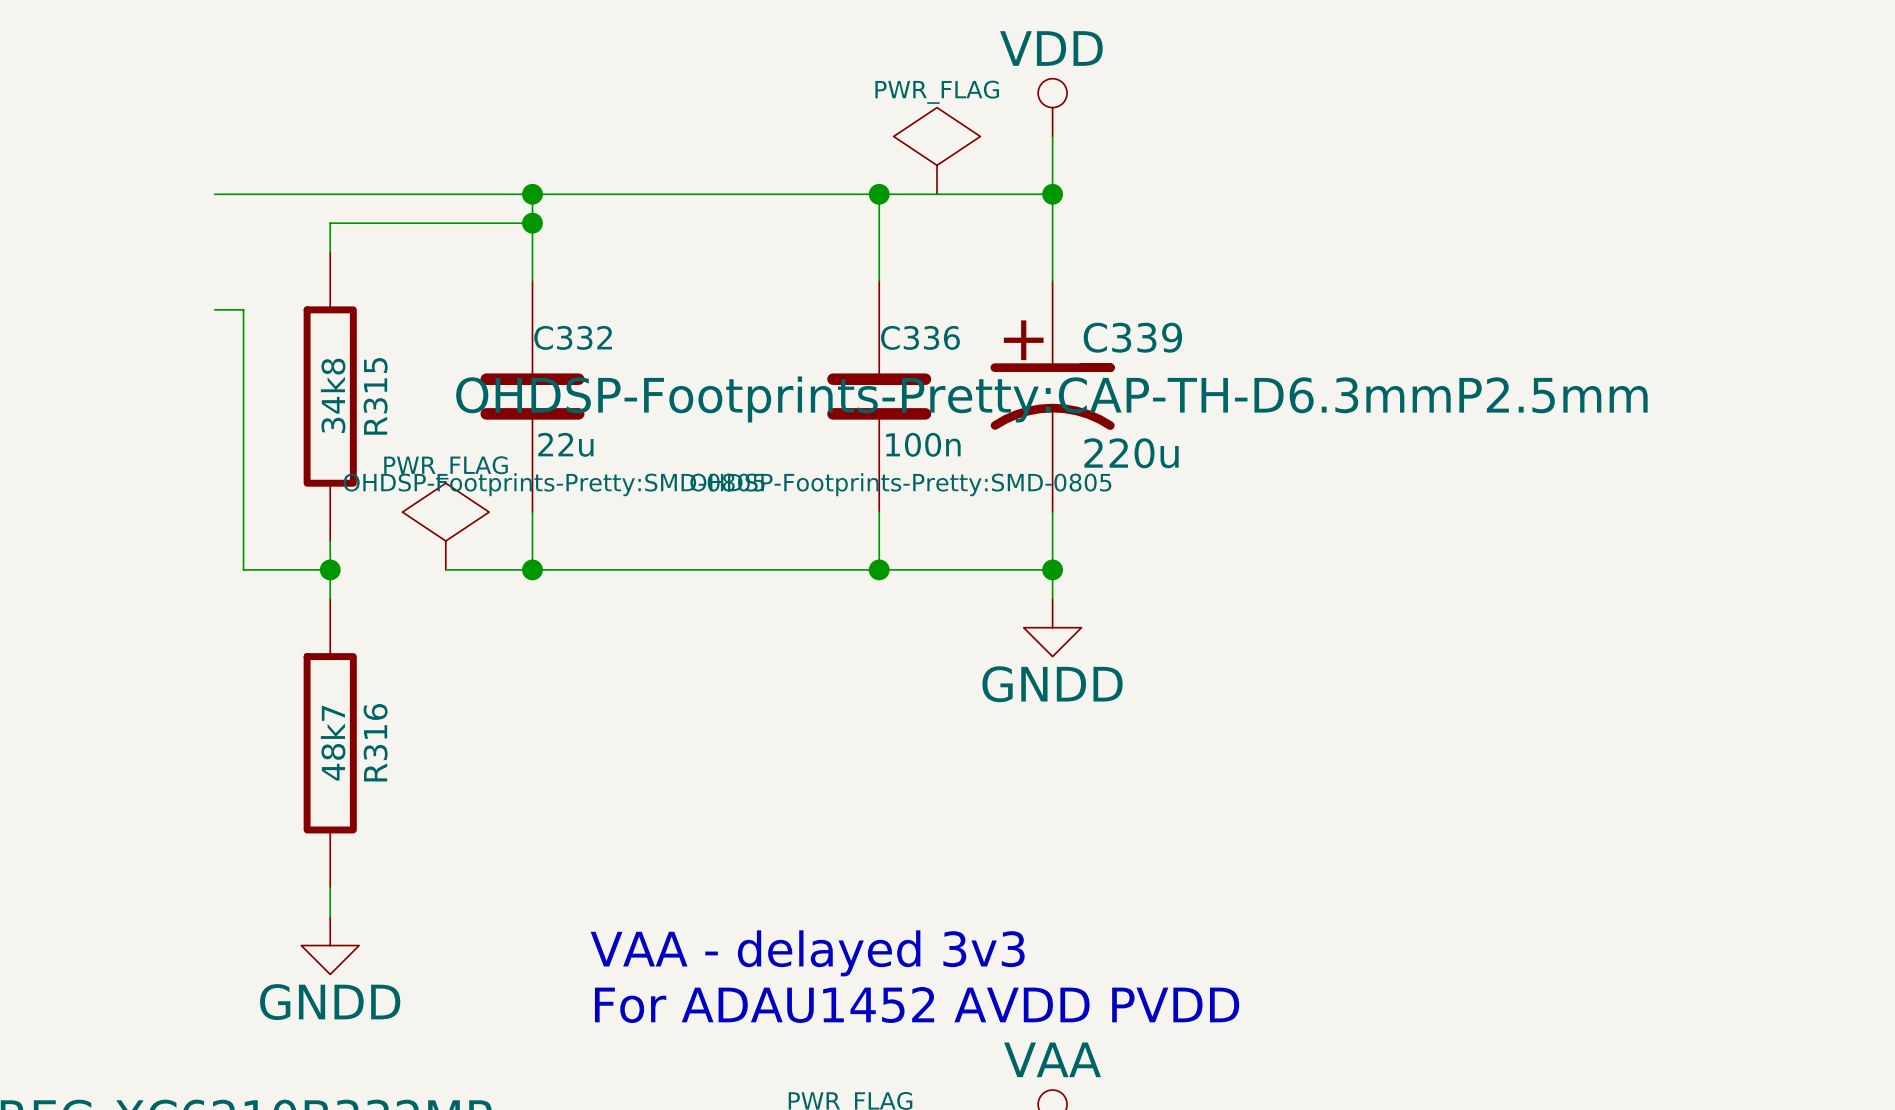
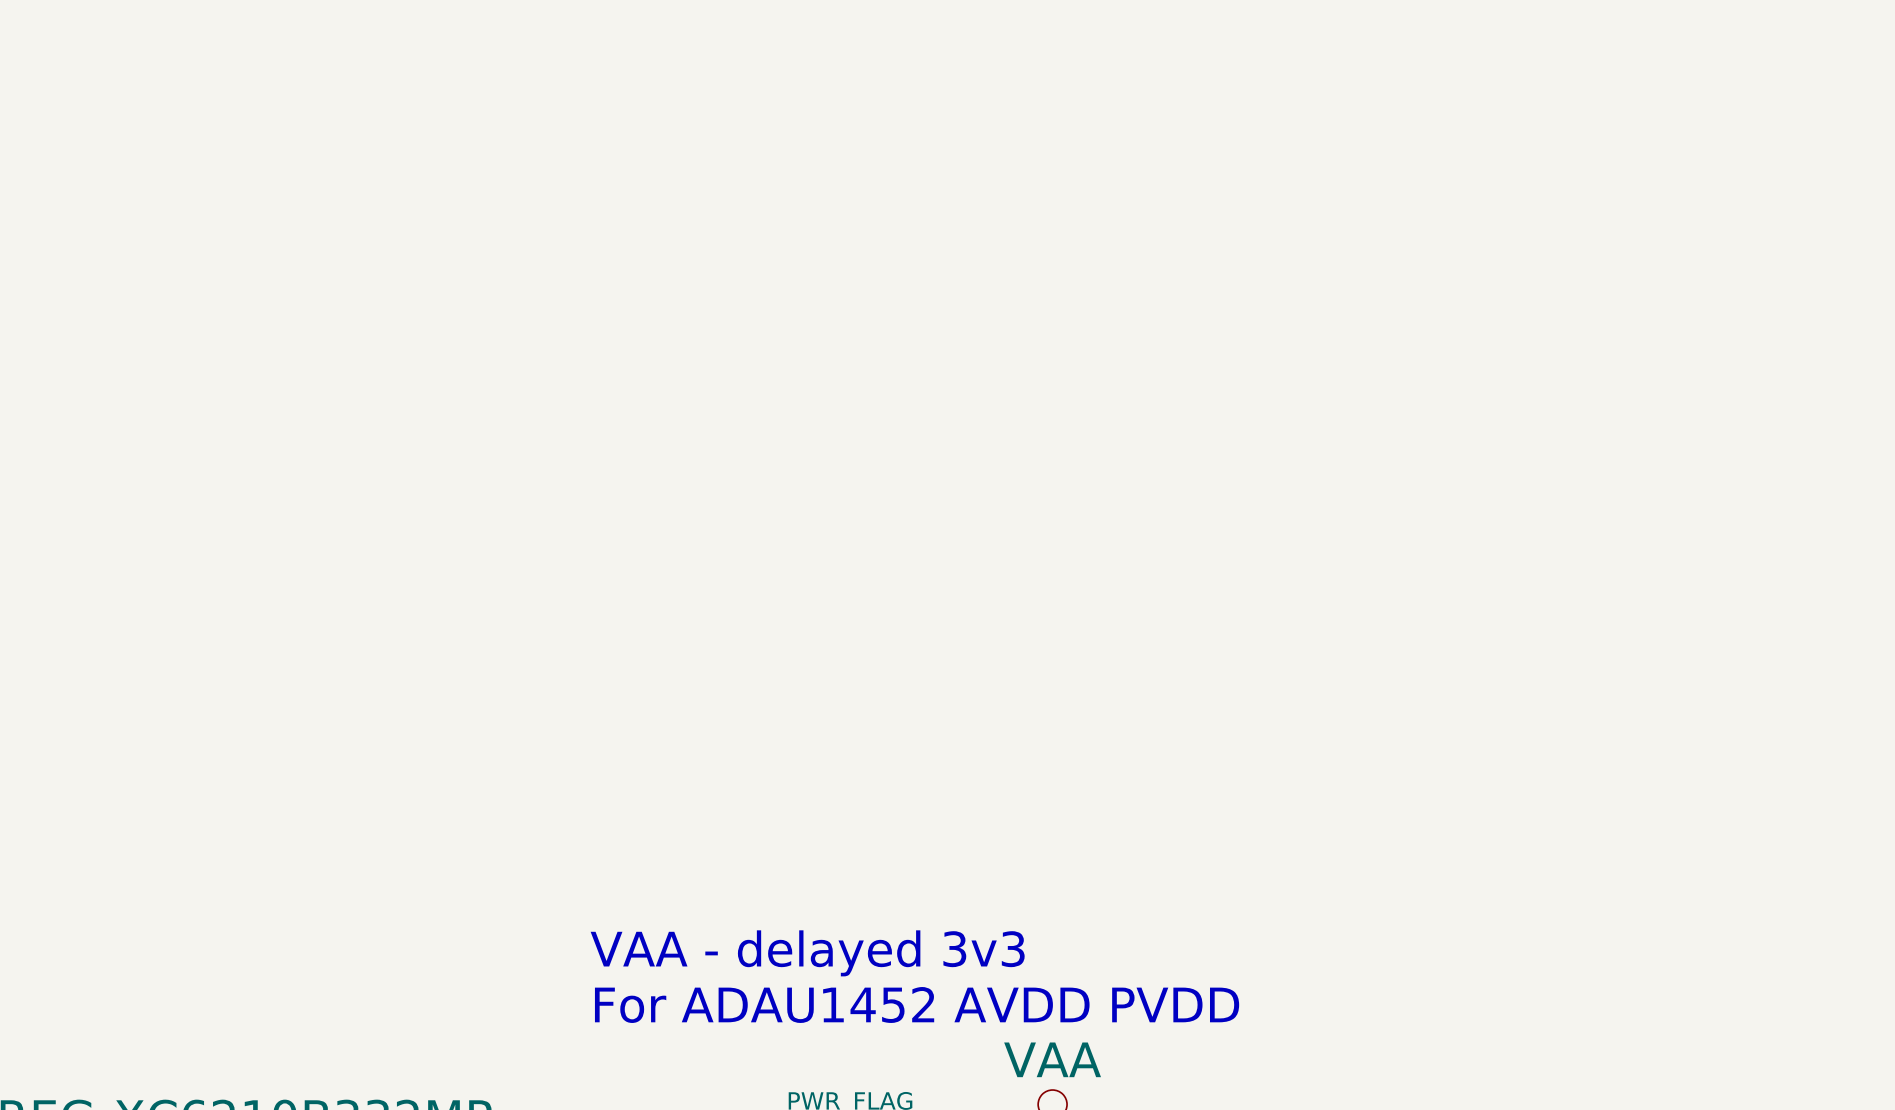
power symbol: VDD (1052, 107) -> none
wire: (1052, 136) (1052, 280) -> none
power symbol: PWR_FLAG (937, 150) -> none
wire: (214, 194) (1052, 194) -> none
wire: (532, 194) (532, 280) -> none
junction: (532, 194) -> none
wire: (879, 194) (879, 280) -> none
junction: (879, 194) -> none
junction: (1052, 194) -> none
wire: (532, 223) (330, 223) (330, 252) -> none
junction: (532, 223) -> none
wire: (214, 309) (243, 309) (243, 569) (330, 569) -> none
R315: 34k8 (330, 396) -> none
C332: 22u (532, 396) -> none
C336: 100n (879, 396) -> none
C339: 220u (1052, 396) -> none
wire: (532, 512) (532, 569) -> none
wire: (879, 512) (879, 569) -> none
wire: (1052, 512) (1052, 598) -> none
power symbol: PWR_FLAG (445, 526) -> none
wire: (330, 541) (330, 598) -> none
junction: (330, 569) -> none
wire: (445, 569) (1052, 569) -> none
junction: (532, 569) -> none
junction: (879, 569) -> none
junction: (1052, 569) -> none
power symbol: GNDD (1052, 627) -> none
R316: 48k7 (330, 743) -> none
wire: (330, 887) (330, 916) -> none
power symbol: GNDD (330, 945) -> none

